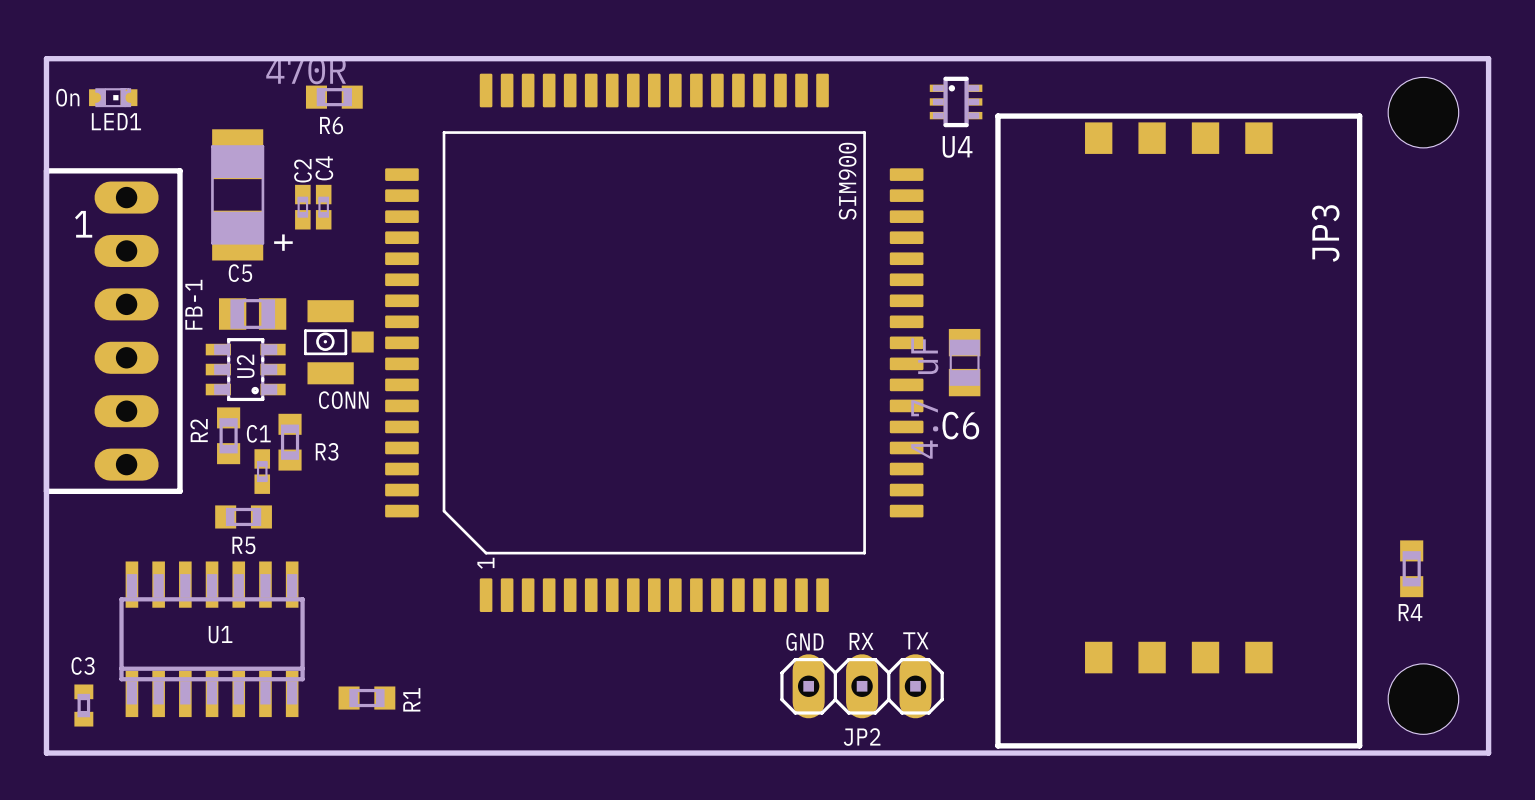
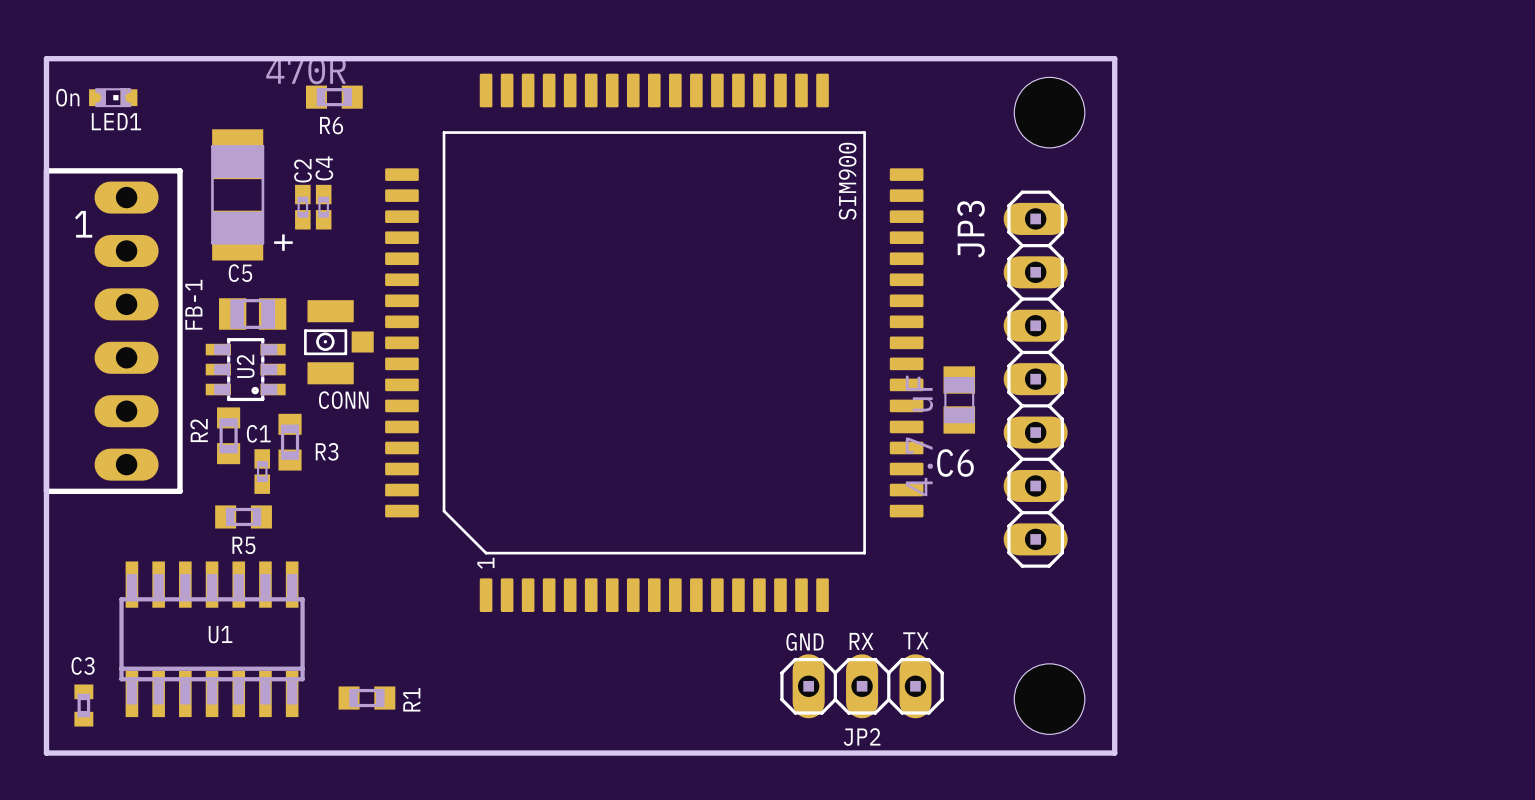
board edge: (1114, 58) (1488, 58) (1488, 753) (1114, 753) -> (1114, 58) (1114, 753)
U4: (956, 101) -> none
hole: none -> (1049, 112)
hole: (1423, 112) -> none
JP3 footprint: [995, 113, 1363, 749] -> [1003, 190, 1068, 568]
JP3 name position: JP3 (1325, 233) -> JP3 (971, 229)
C6 position: (964, 362) -> (959, 399)
R4: (1411, 568) -> none
hole: none -> (1049, 699)
hole: (1423, 699) -> none

